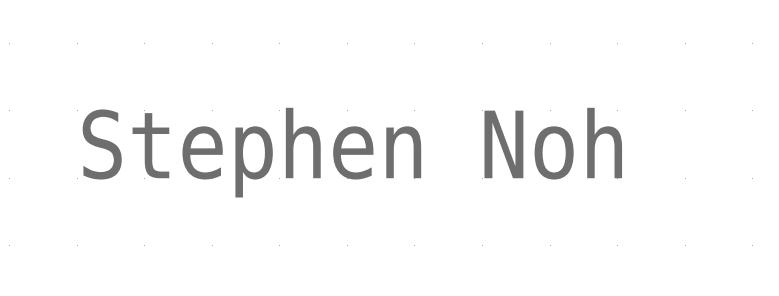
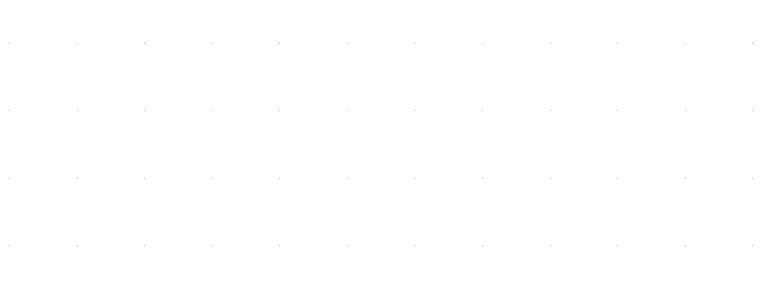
text: Stephen Noh (352, 152) -> none

